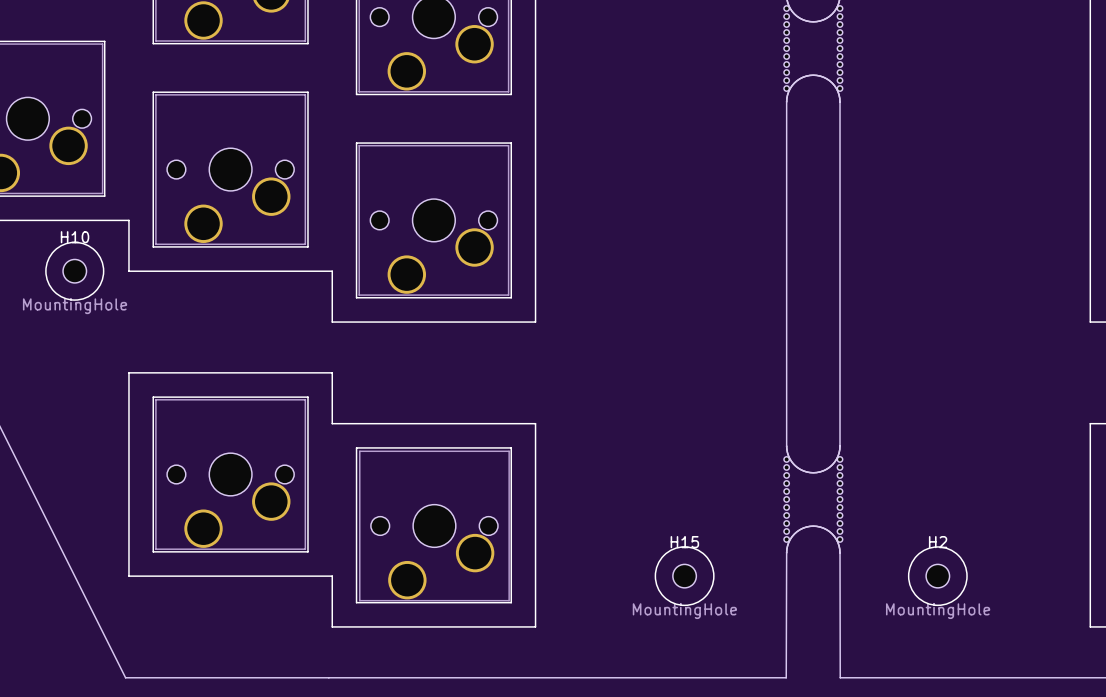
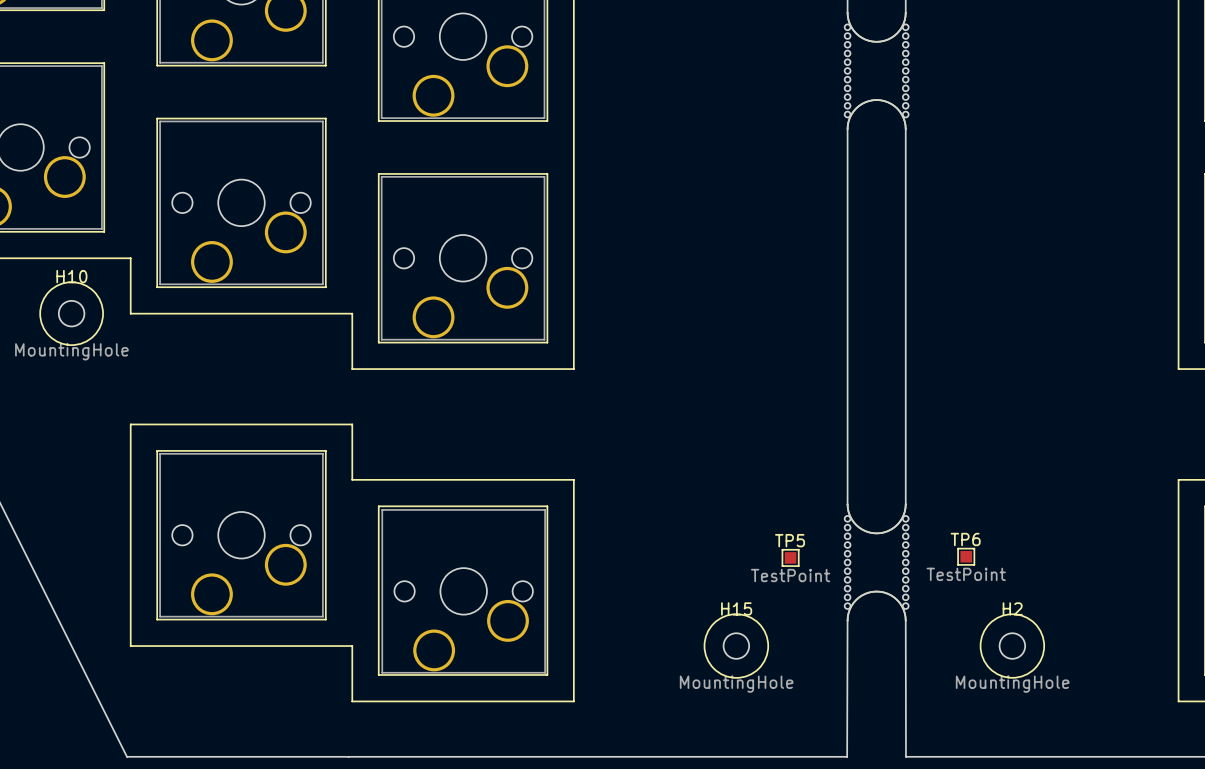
TP6: none -> TestPoint (966, 556)
TP5: none -> TestPoint (790, 557)

